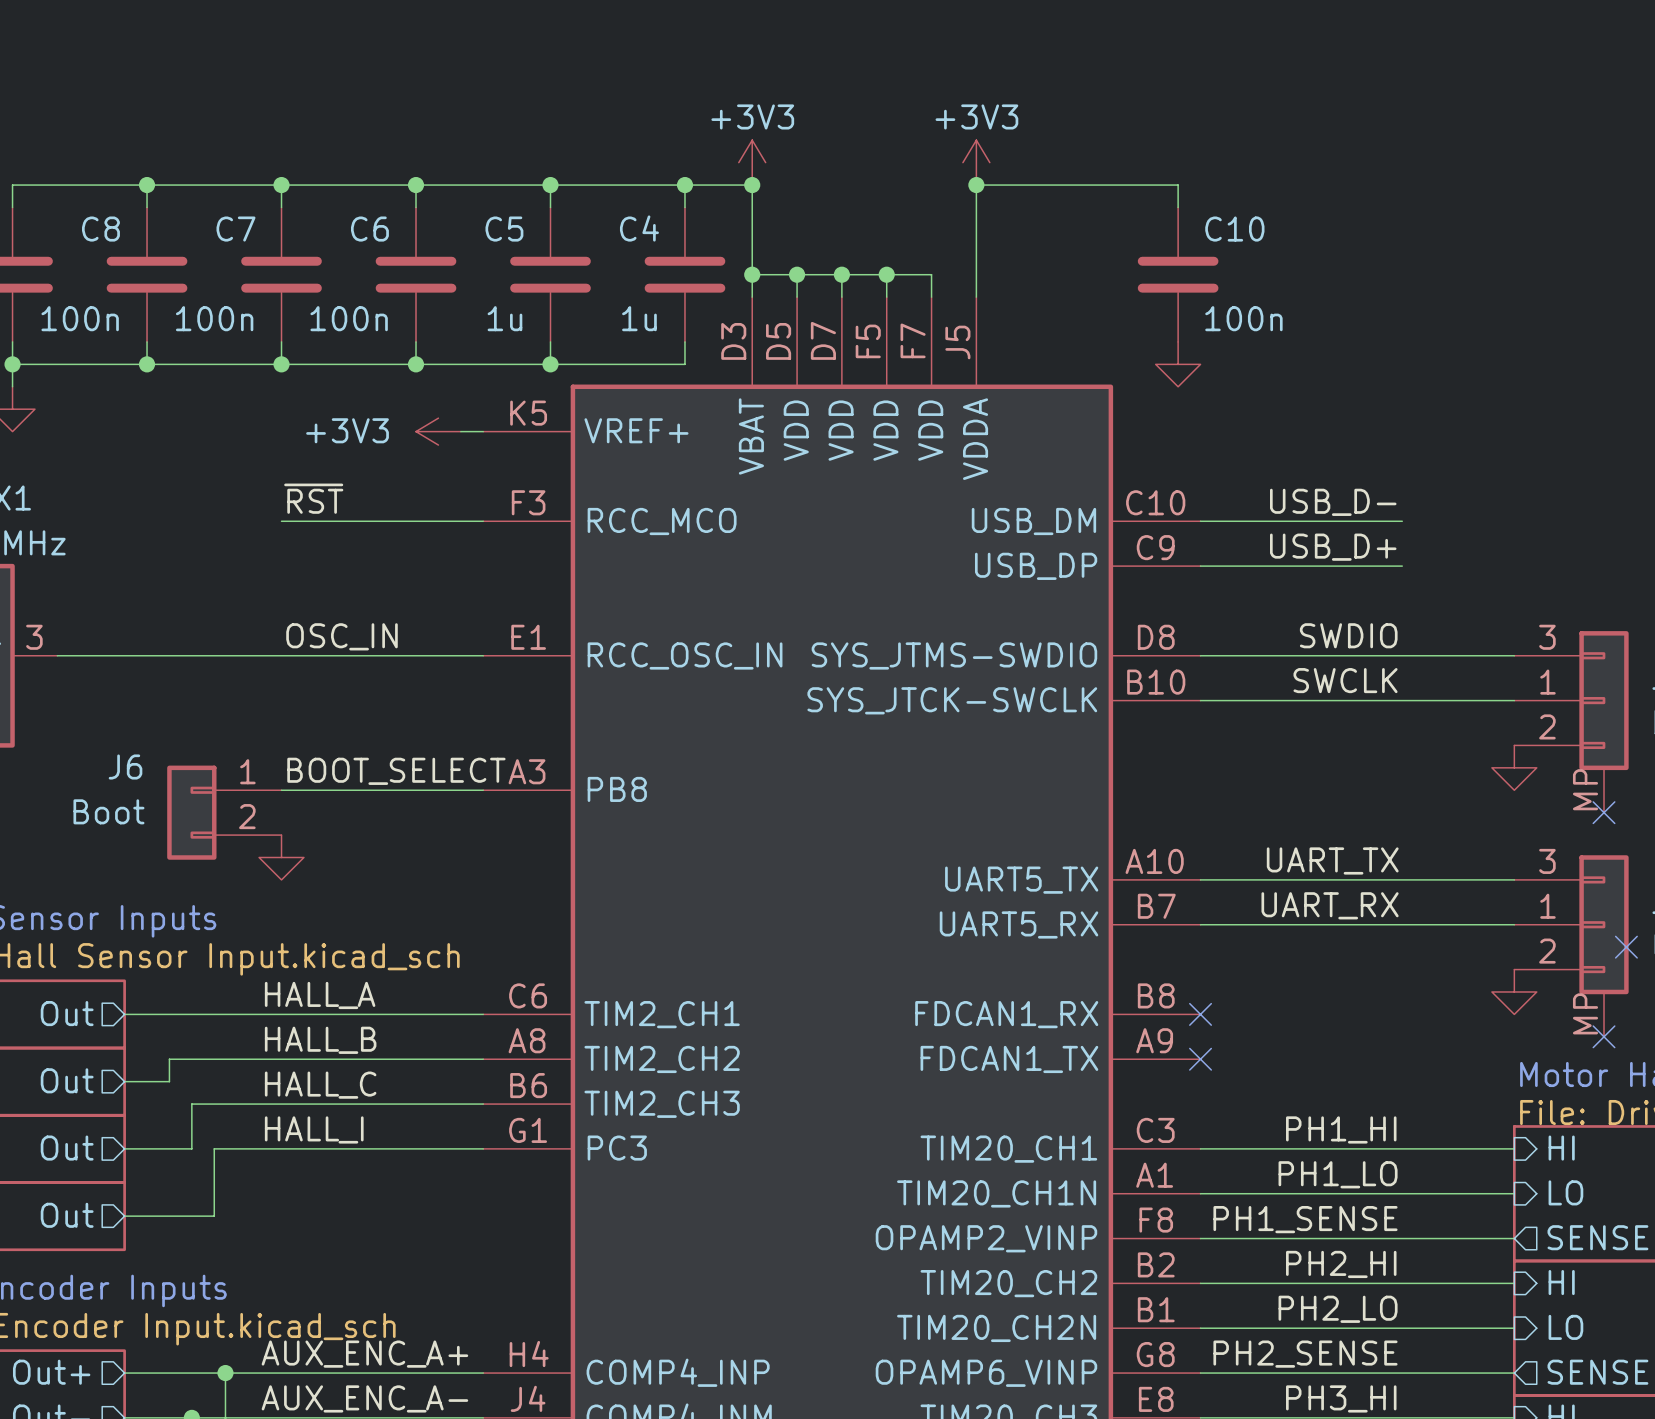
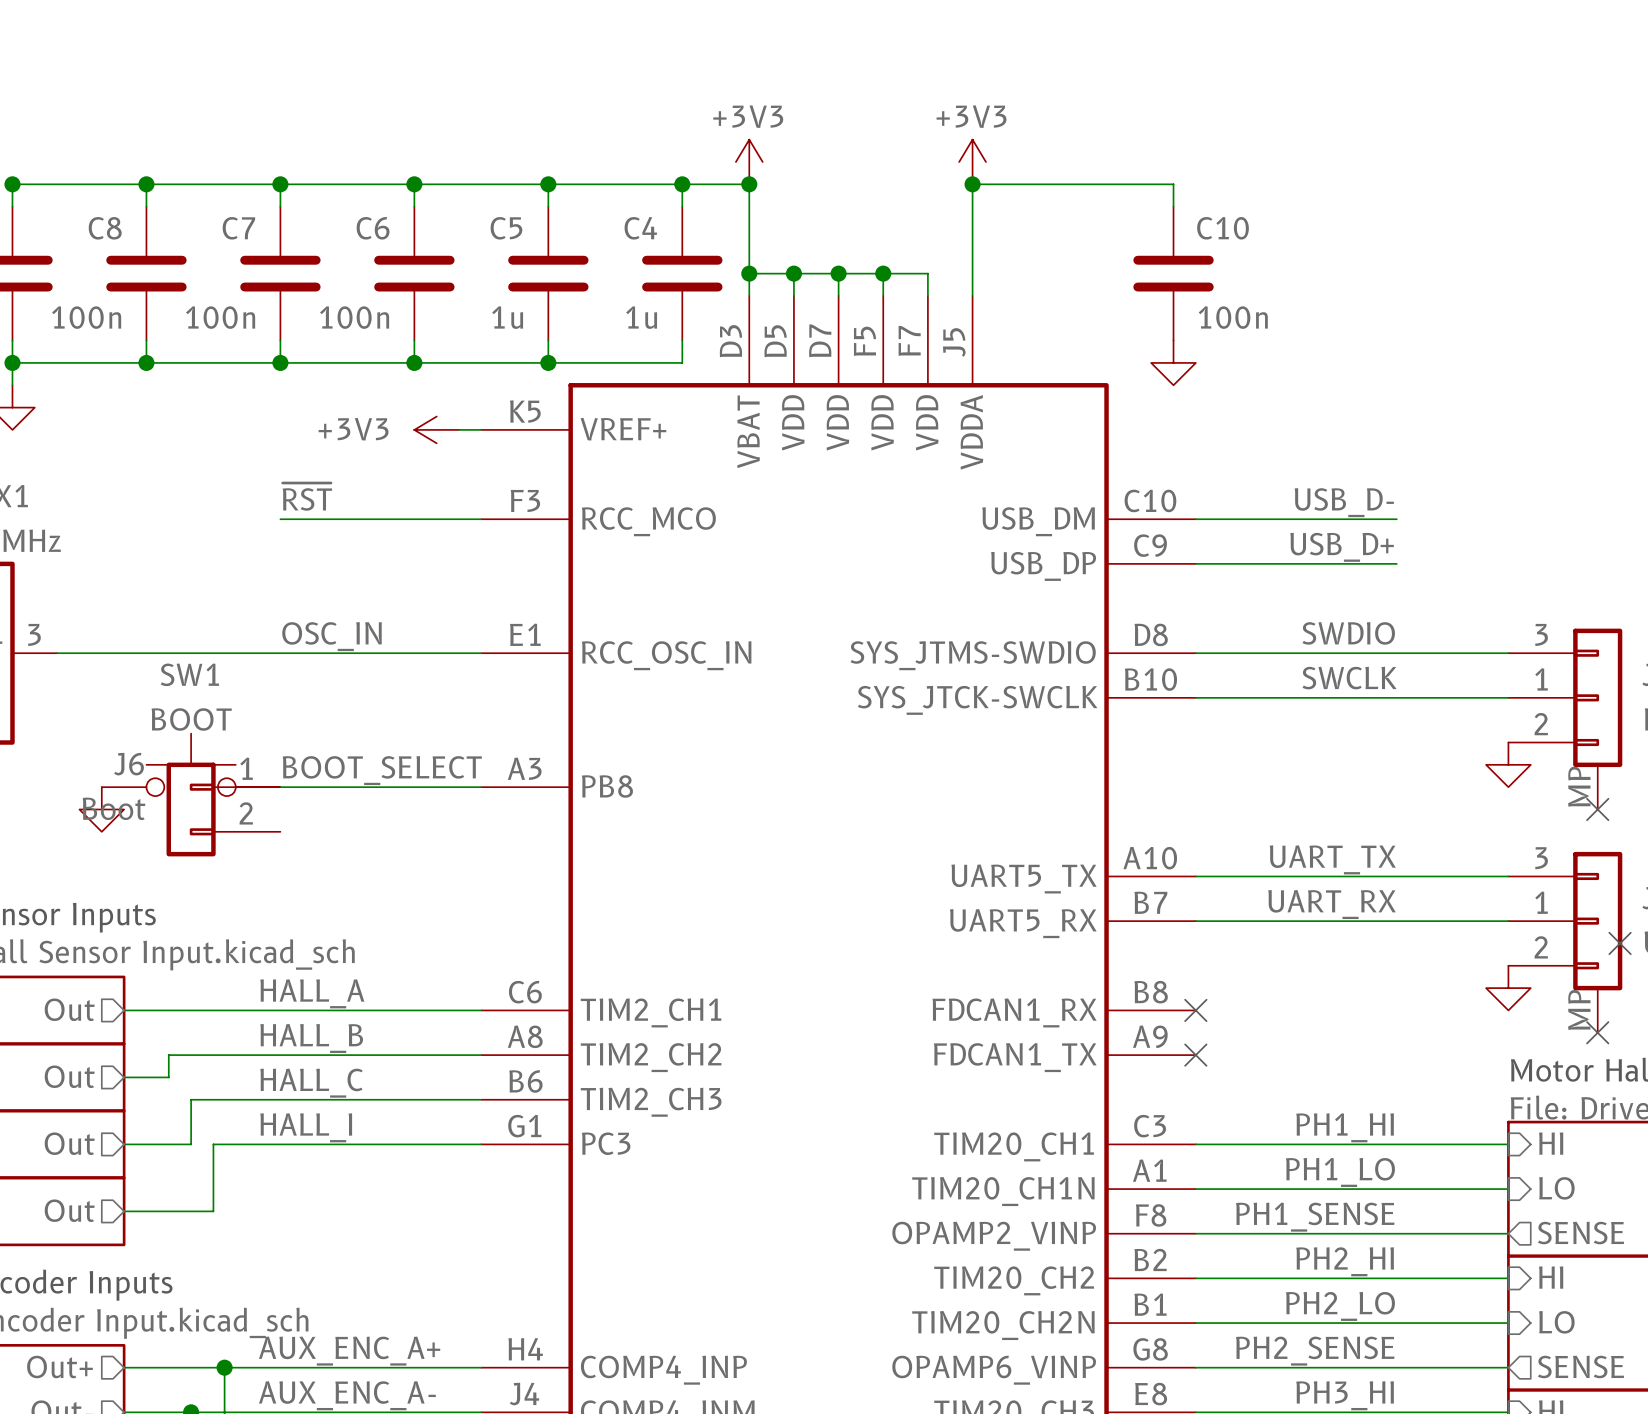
junction: none -> (12, 184)
SW1: none -> BOOT (191, 764)
power symbol position: (281, 857) -> (101, 809)

